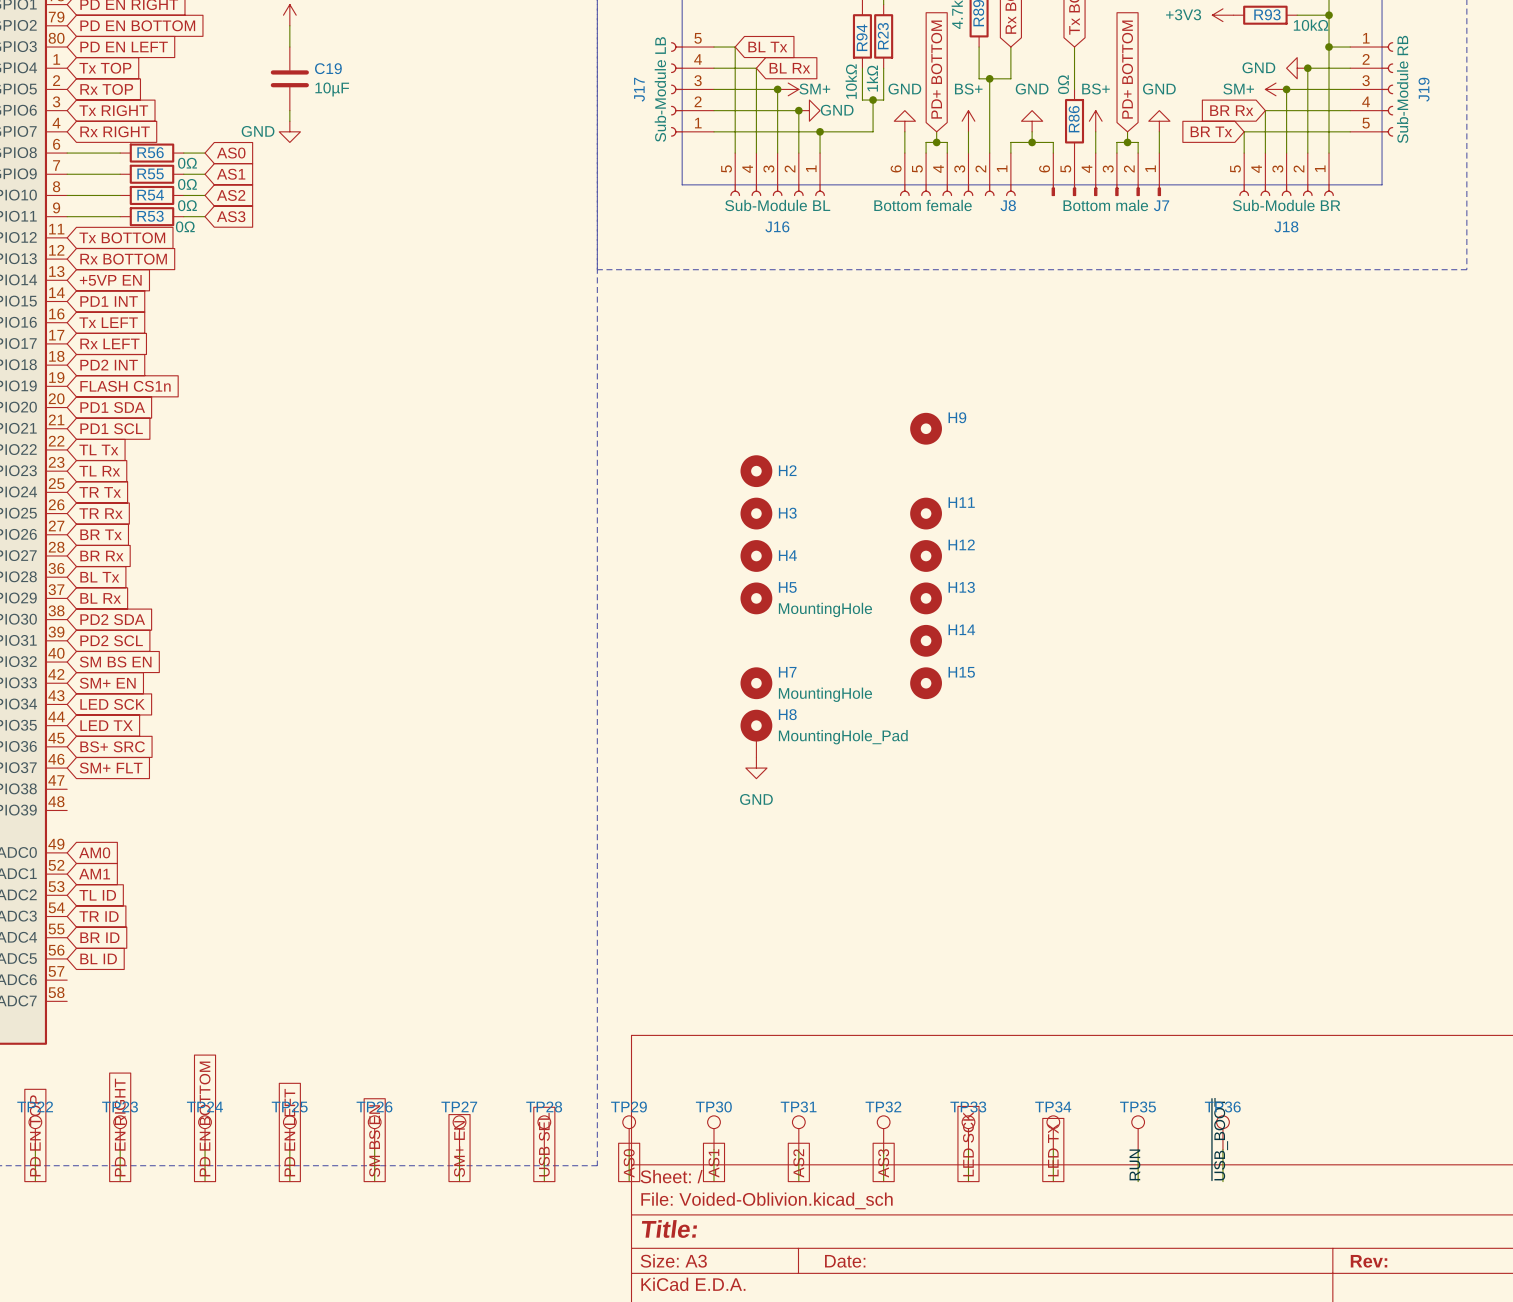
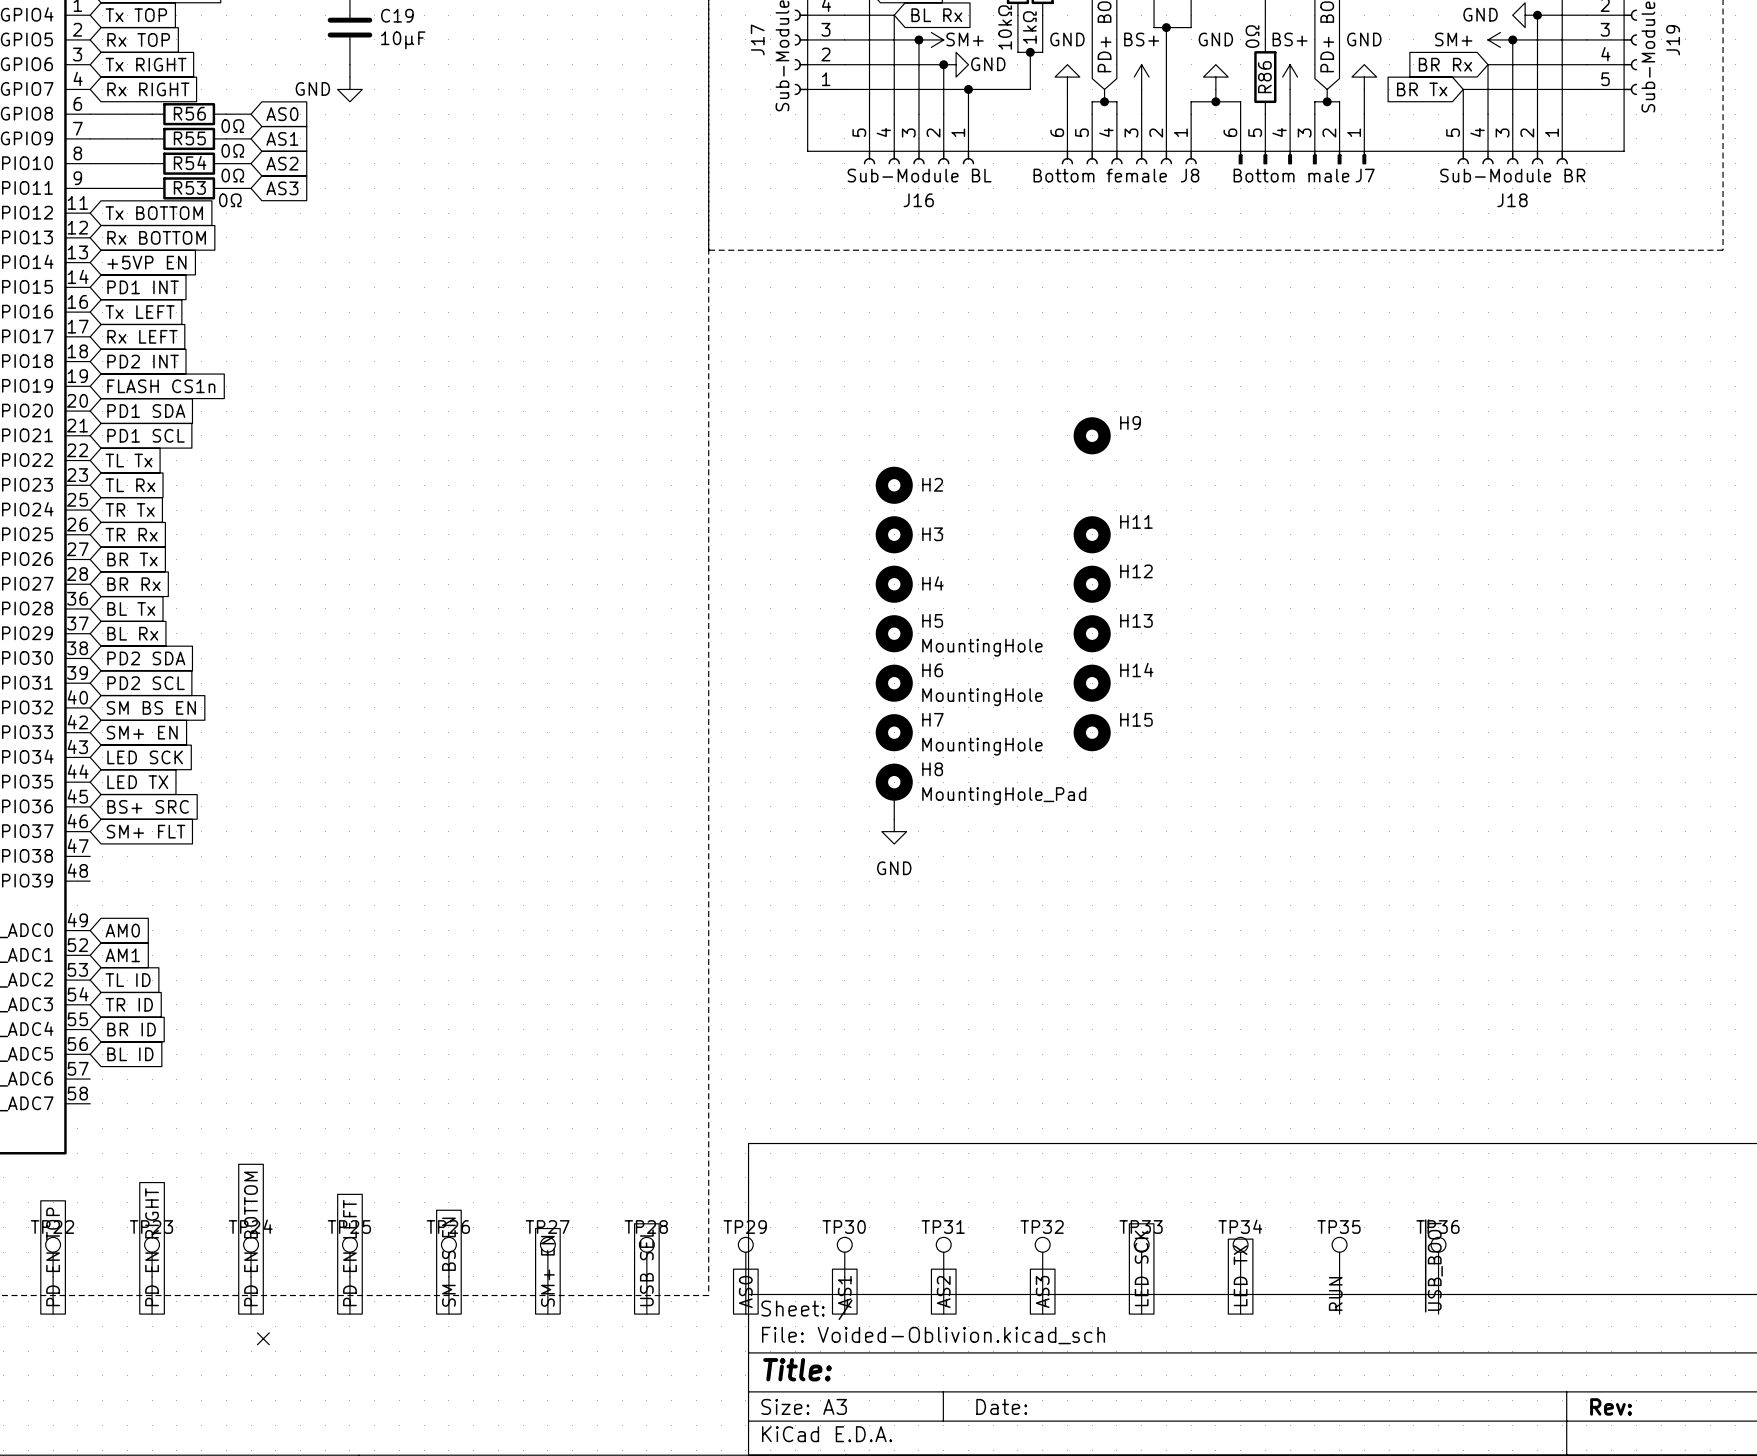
H6: none -> MountingHole (894, 683)
no-connect mark: none -> (263, 1338)

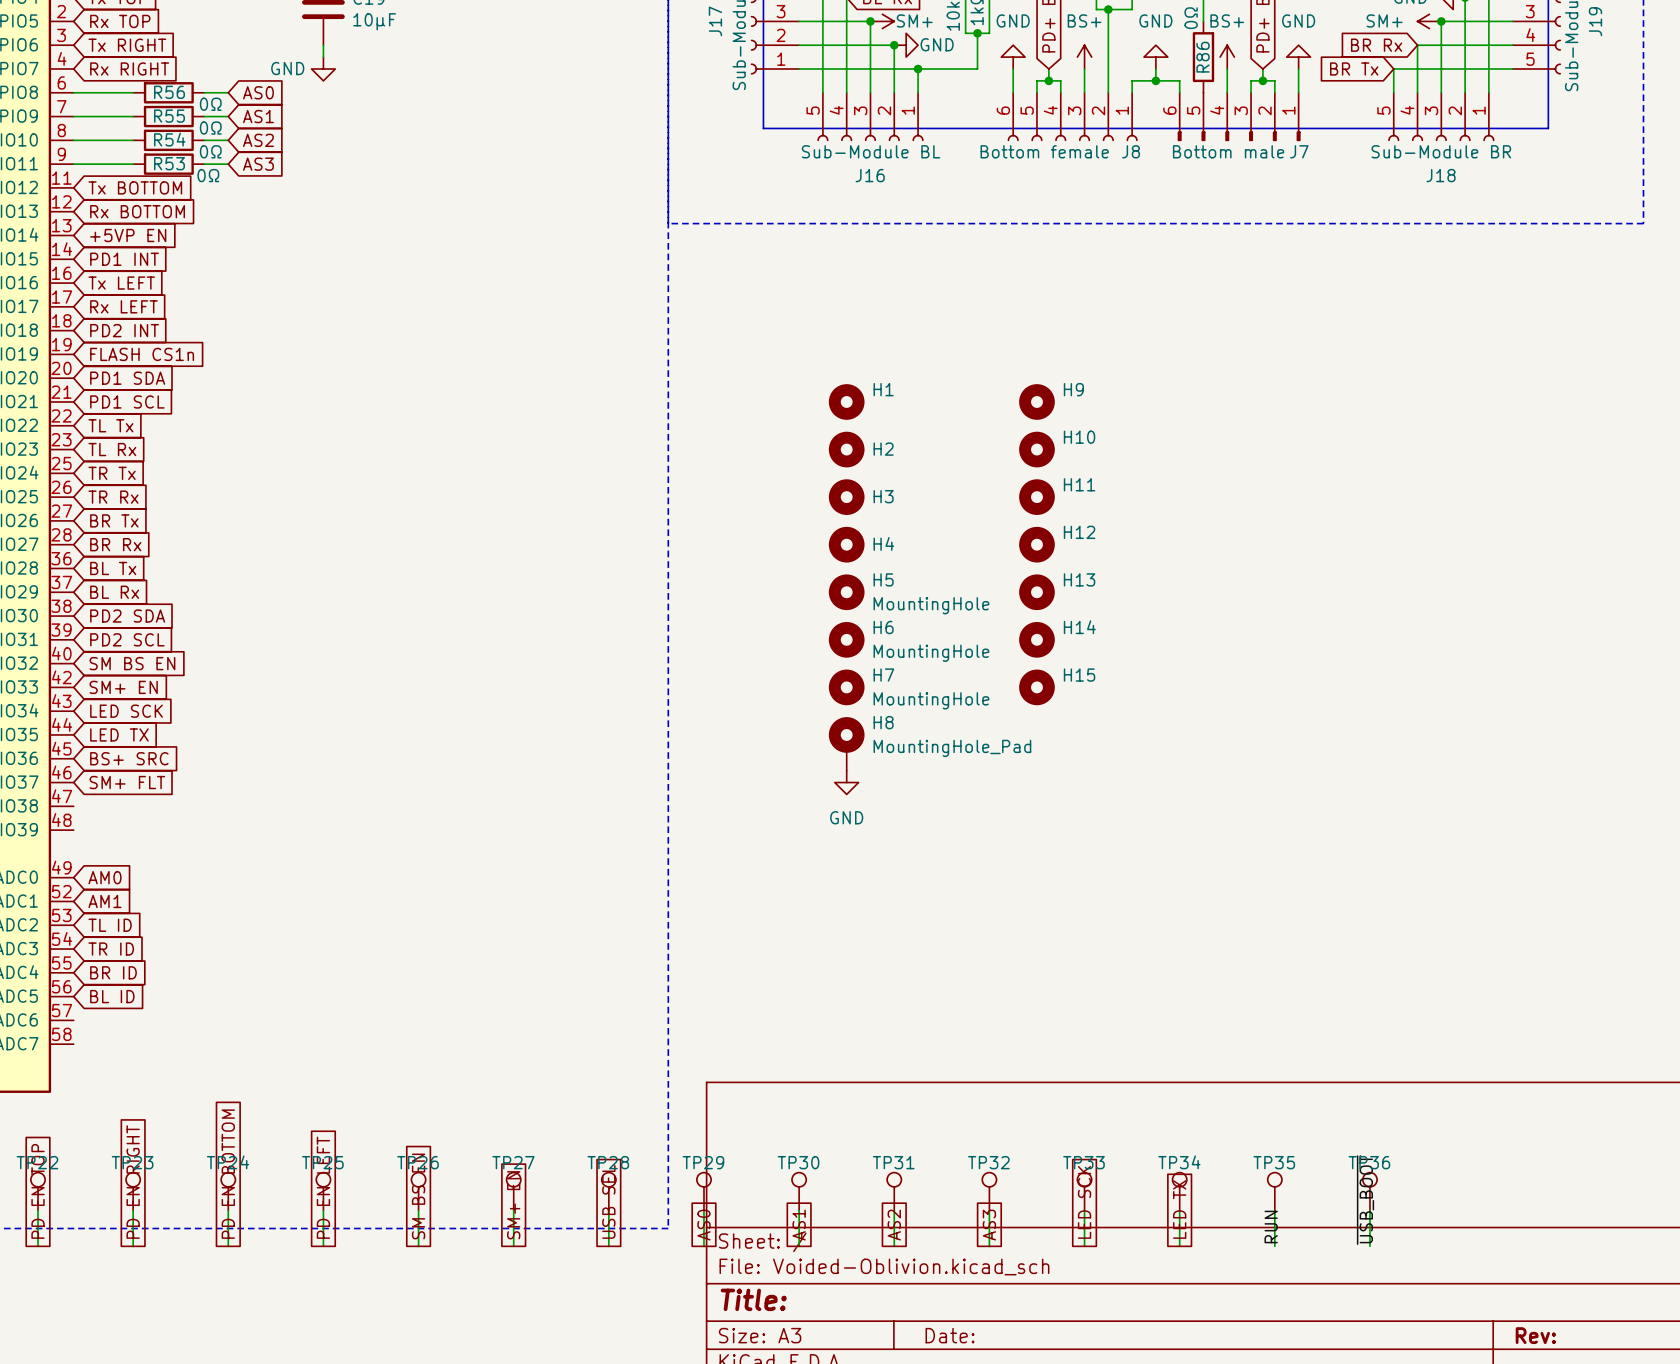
H1: none -> (846, 401)
H10: none -> (1036, 449)
no-connect mark: (263, 1338) -> none

